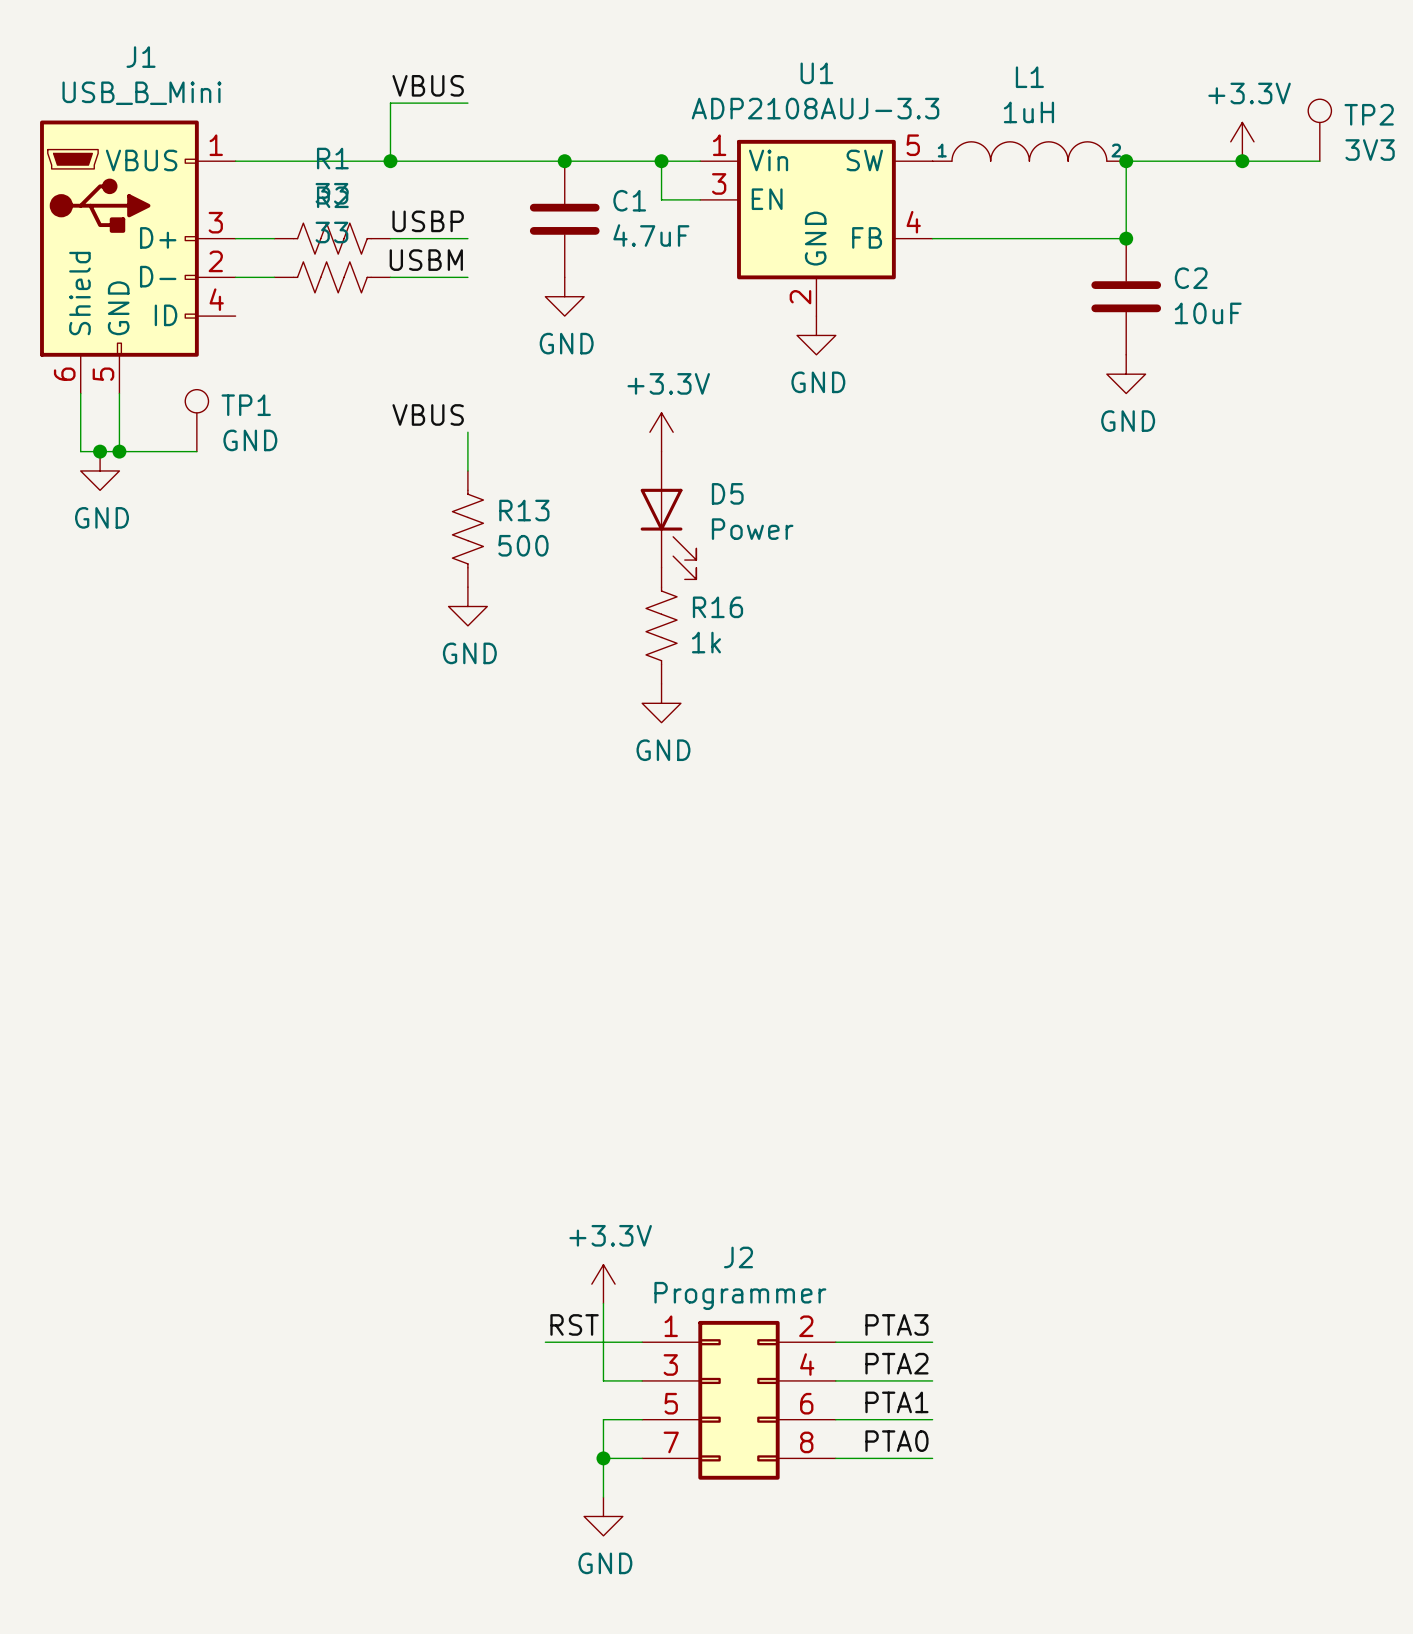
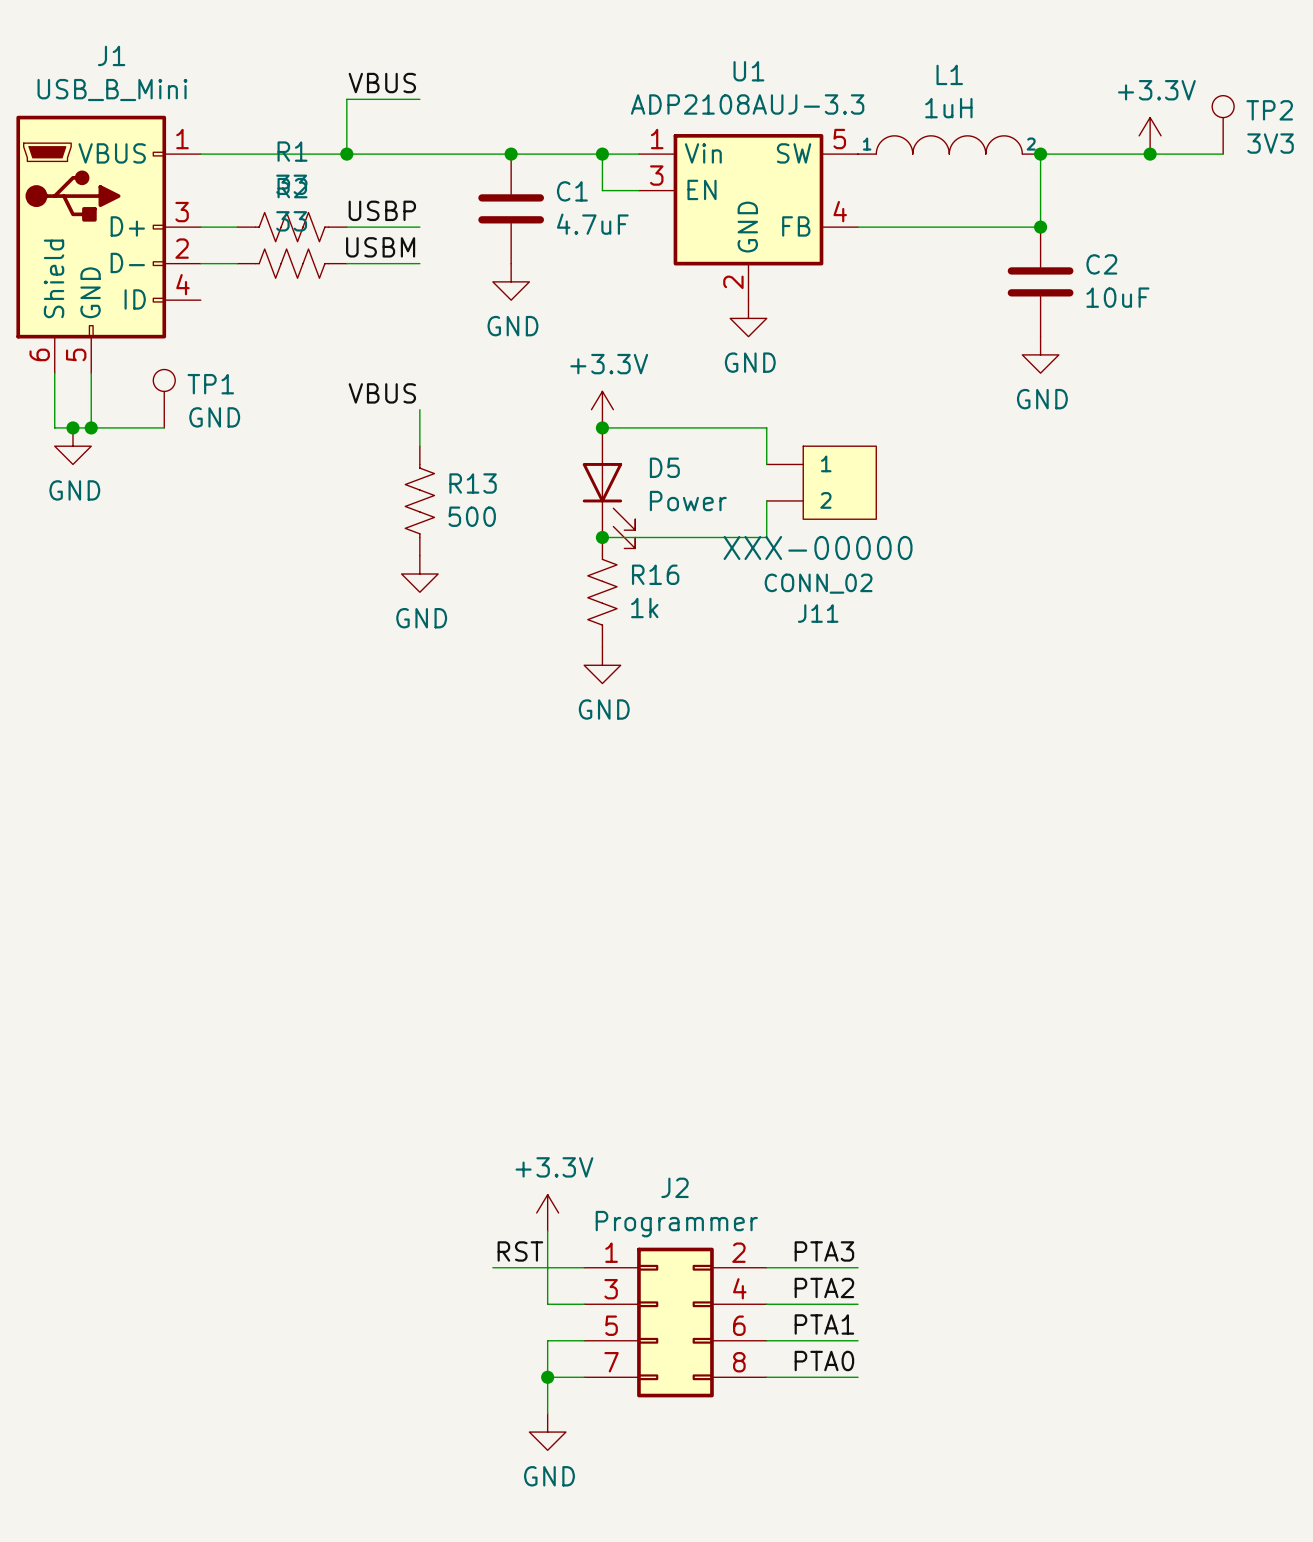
wire: none -> (602, 427) (766, 427) (766, 464)
junction: none -> (602, 427)
J11: none -> CONN_02 (821, 482)
wire: none -> (766, 500) (766, 537) (602, 537)
junction: none -> (602, 537)

